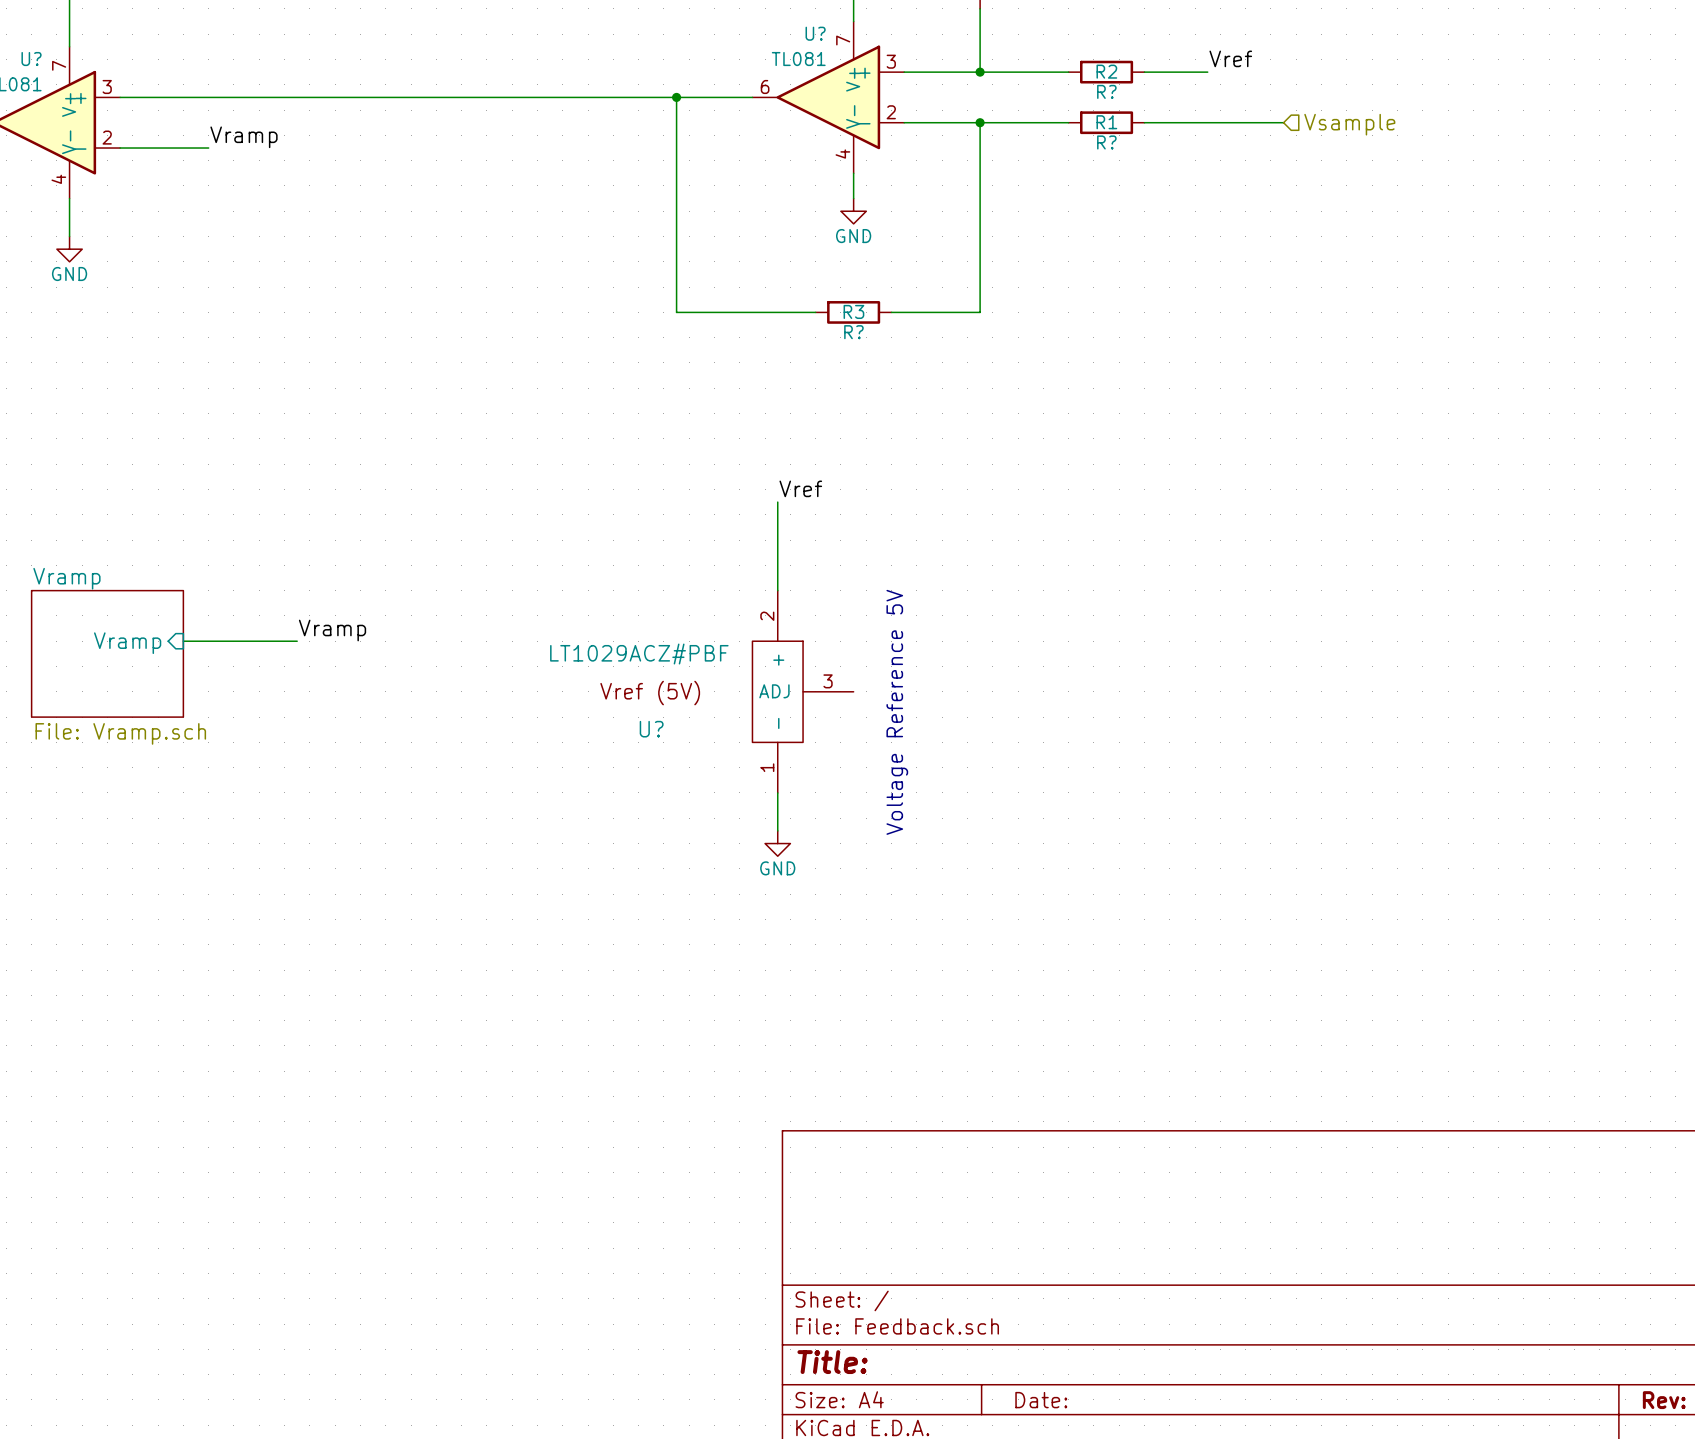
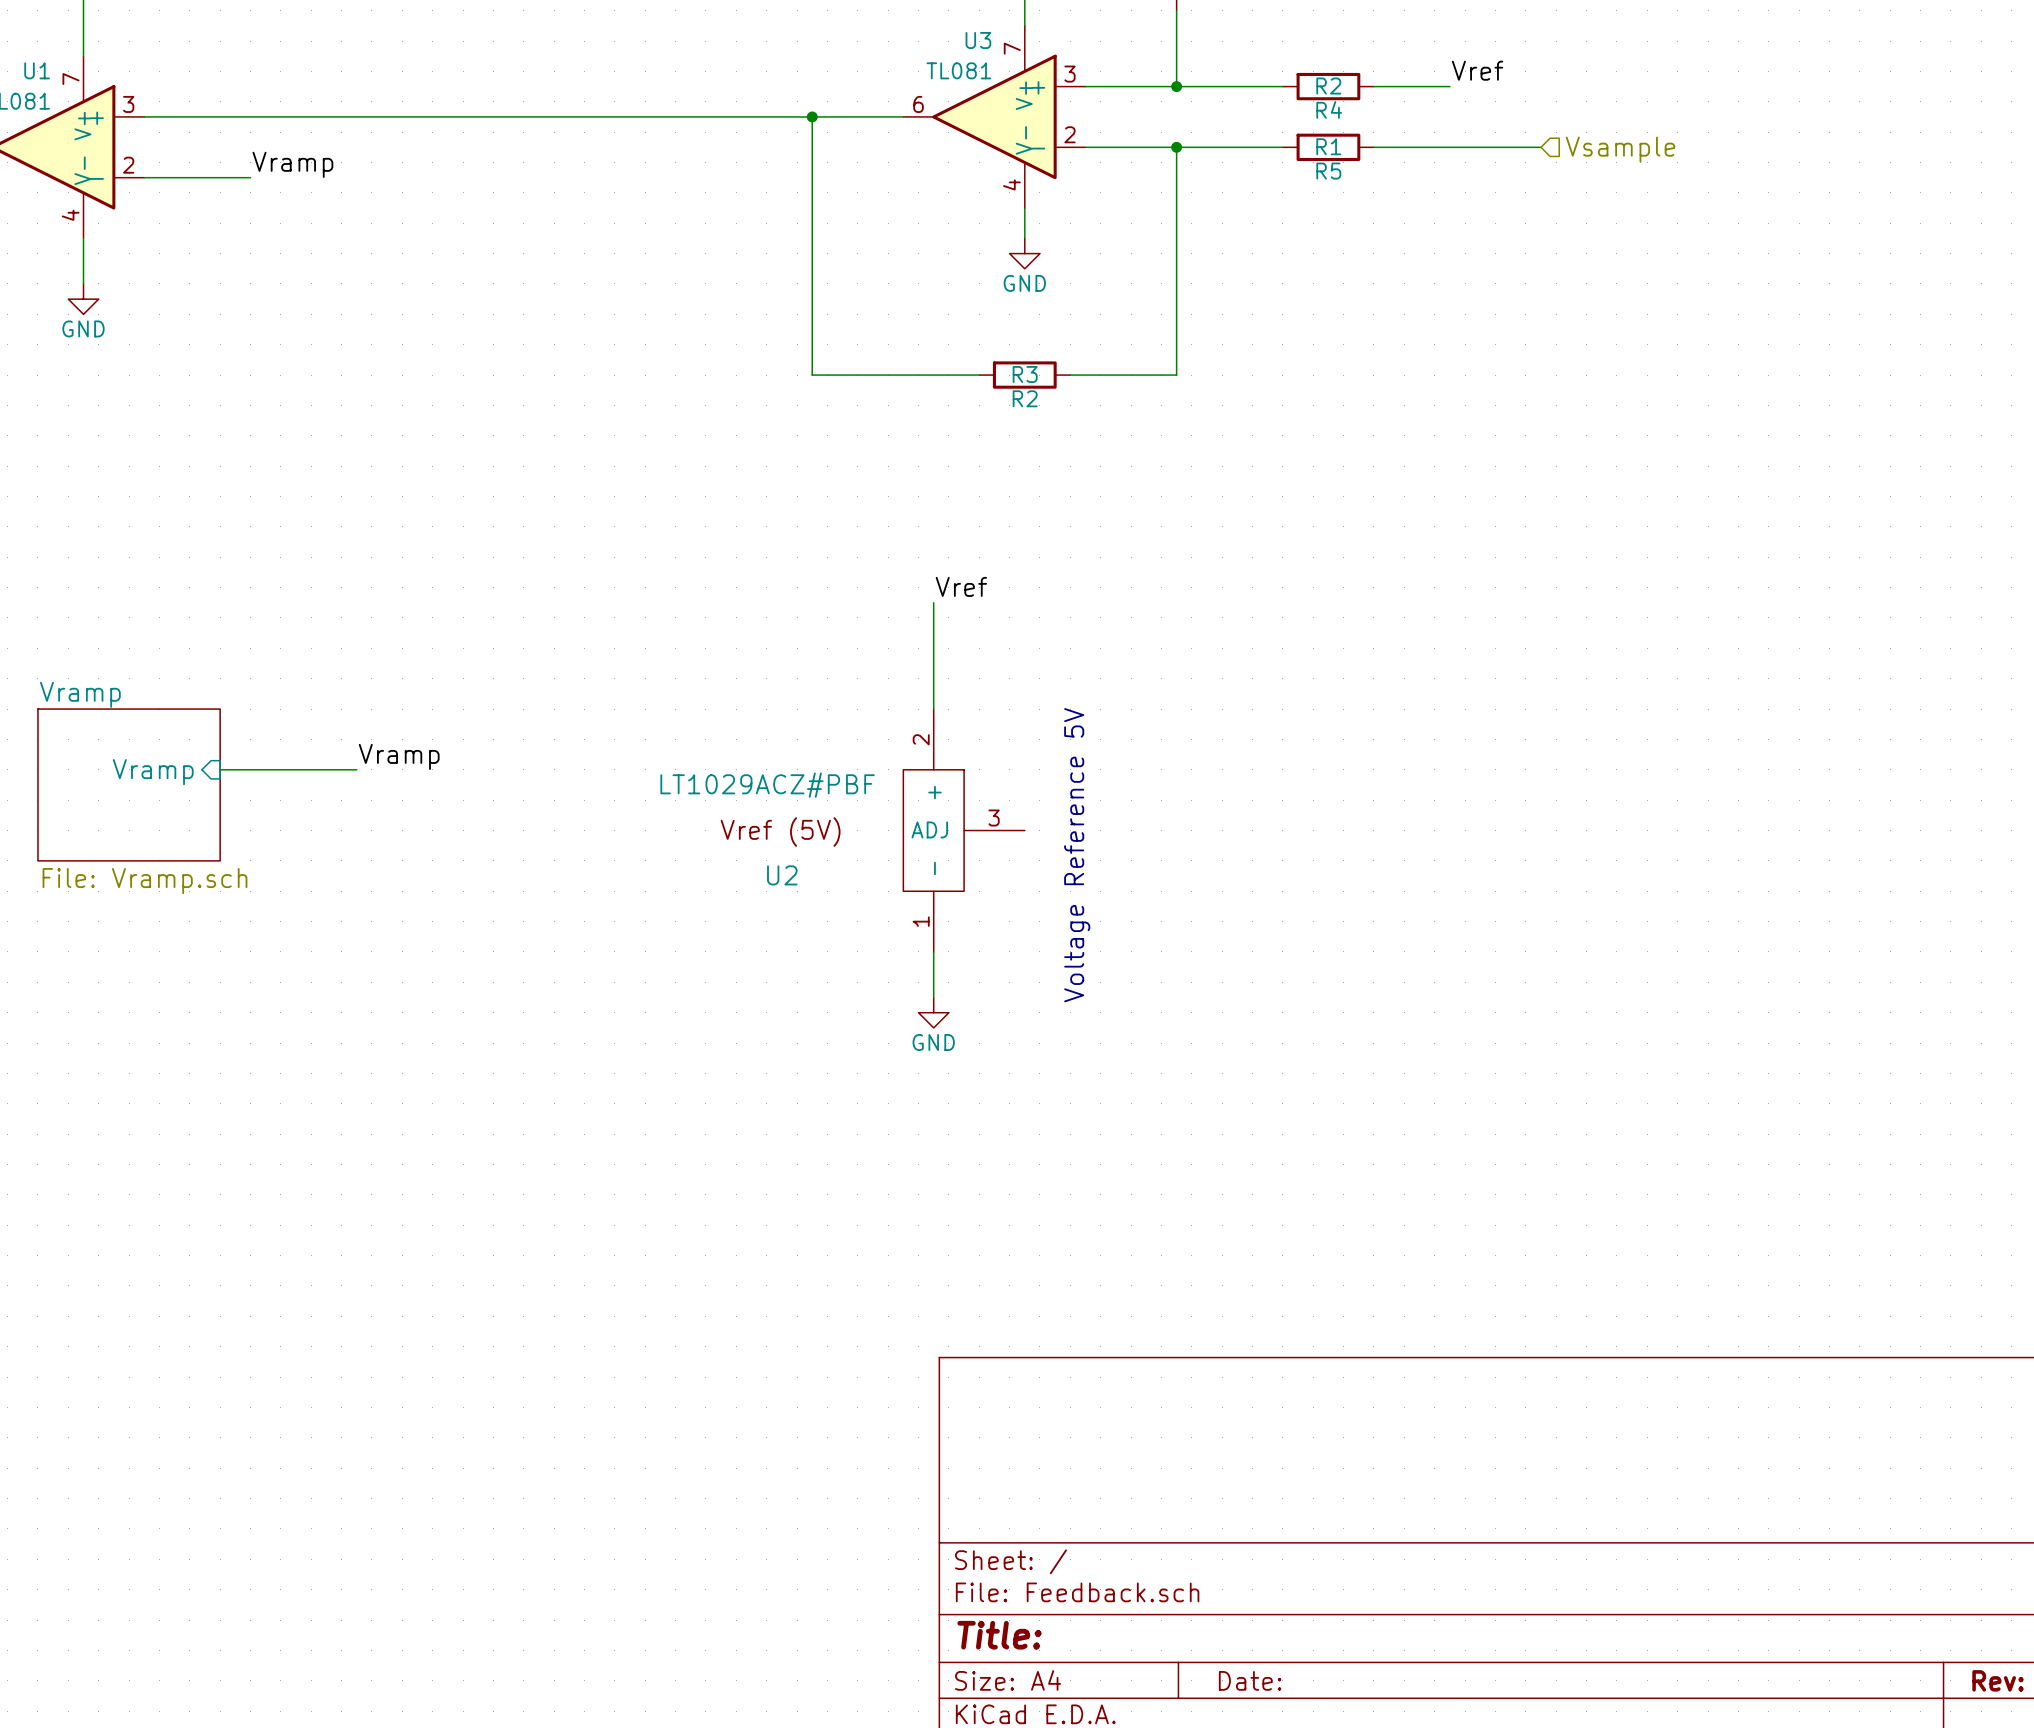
U? name: U? (815, 33) -> U3 (978, 40)
U? name: U? (31, 59) -> U1 (37, 70)
R? name: R? (1106, 91) -> R4 (1329, 109)
R? name: R? (1106, 142) -> R5 (1328, 171)
R? name: R? (853, 332) -> R2 (1025, 398)
U? name: U? (651, 729) -> U2 (782, 875)

